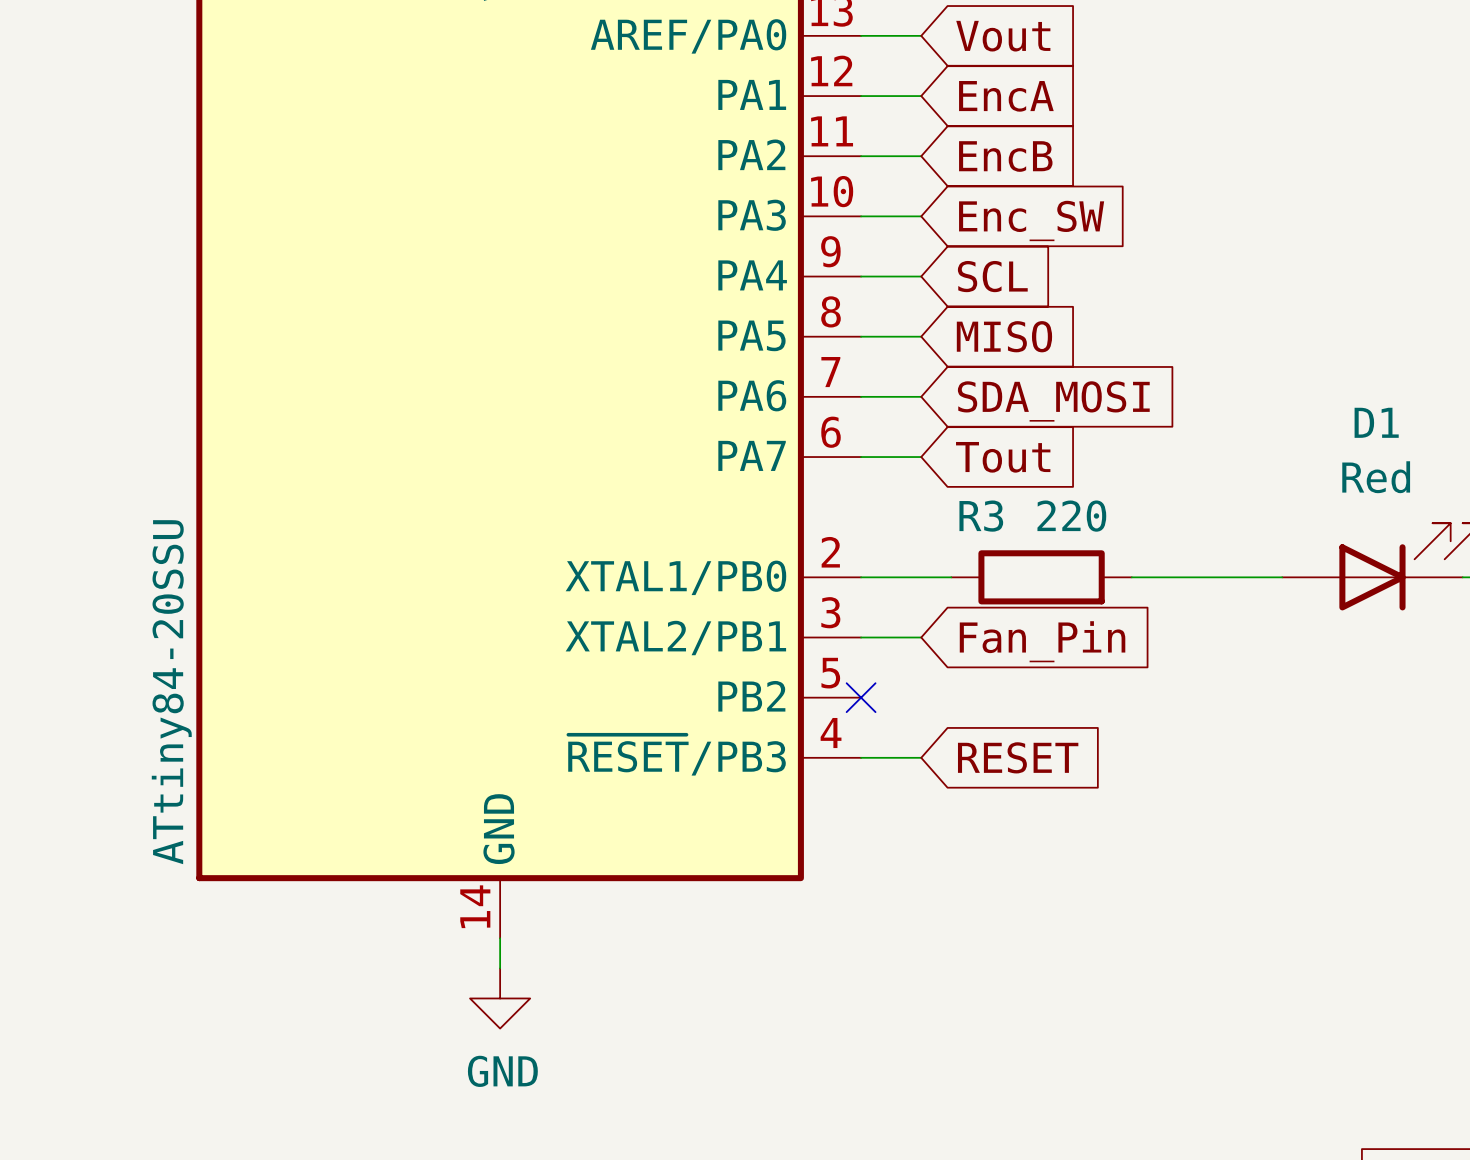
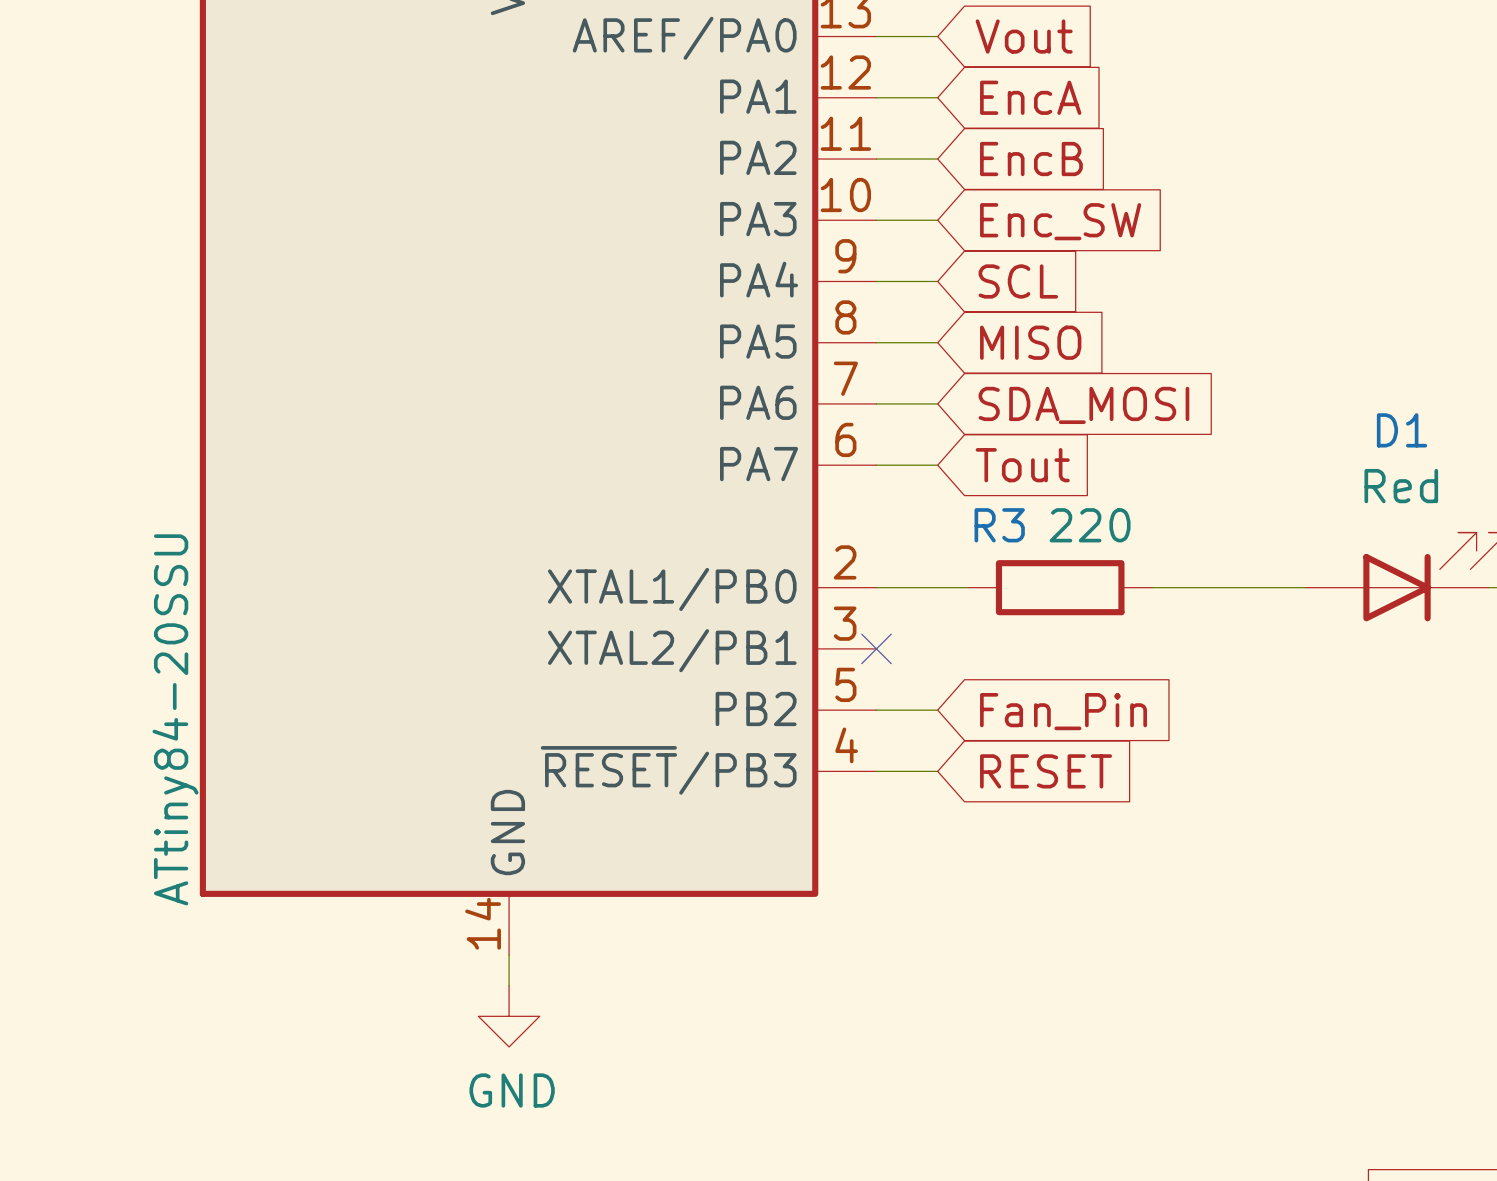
wire: (861, 637) (921, 637) -> (876, 710) (937, 710)
global label position: Fan_Pin (1042, 641) -> Fan_Pin (1063, 711)
no-connect mark position: (861, 697) -> (876, 648)

